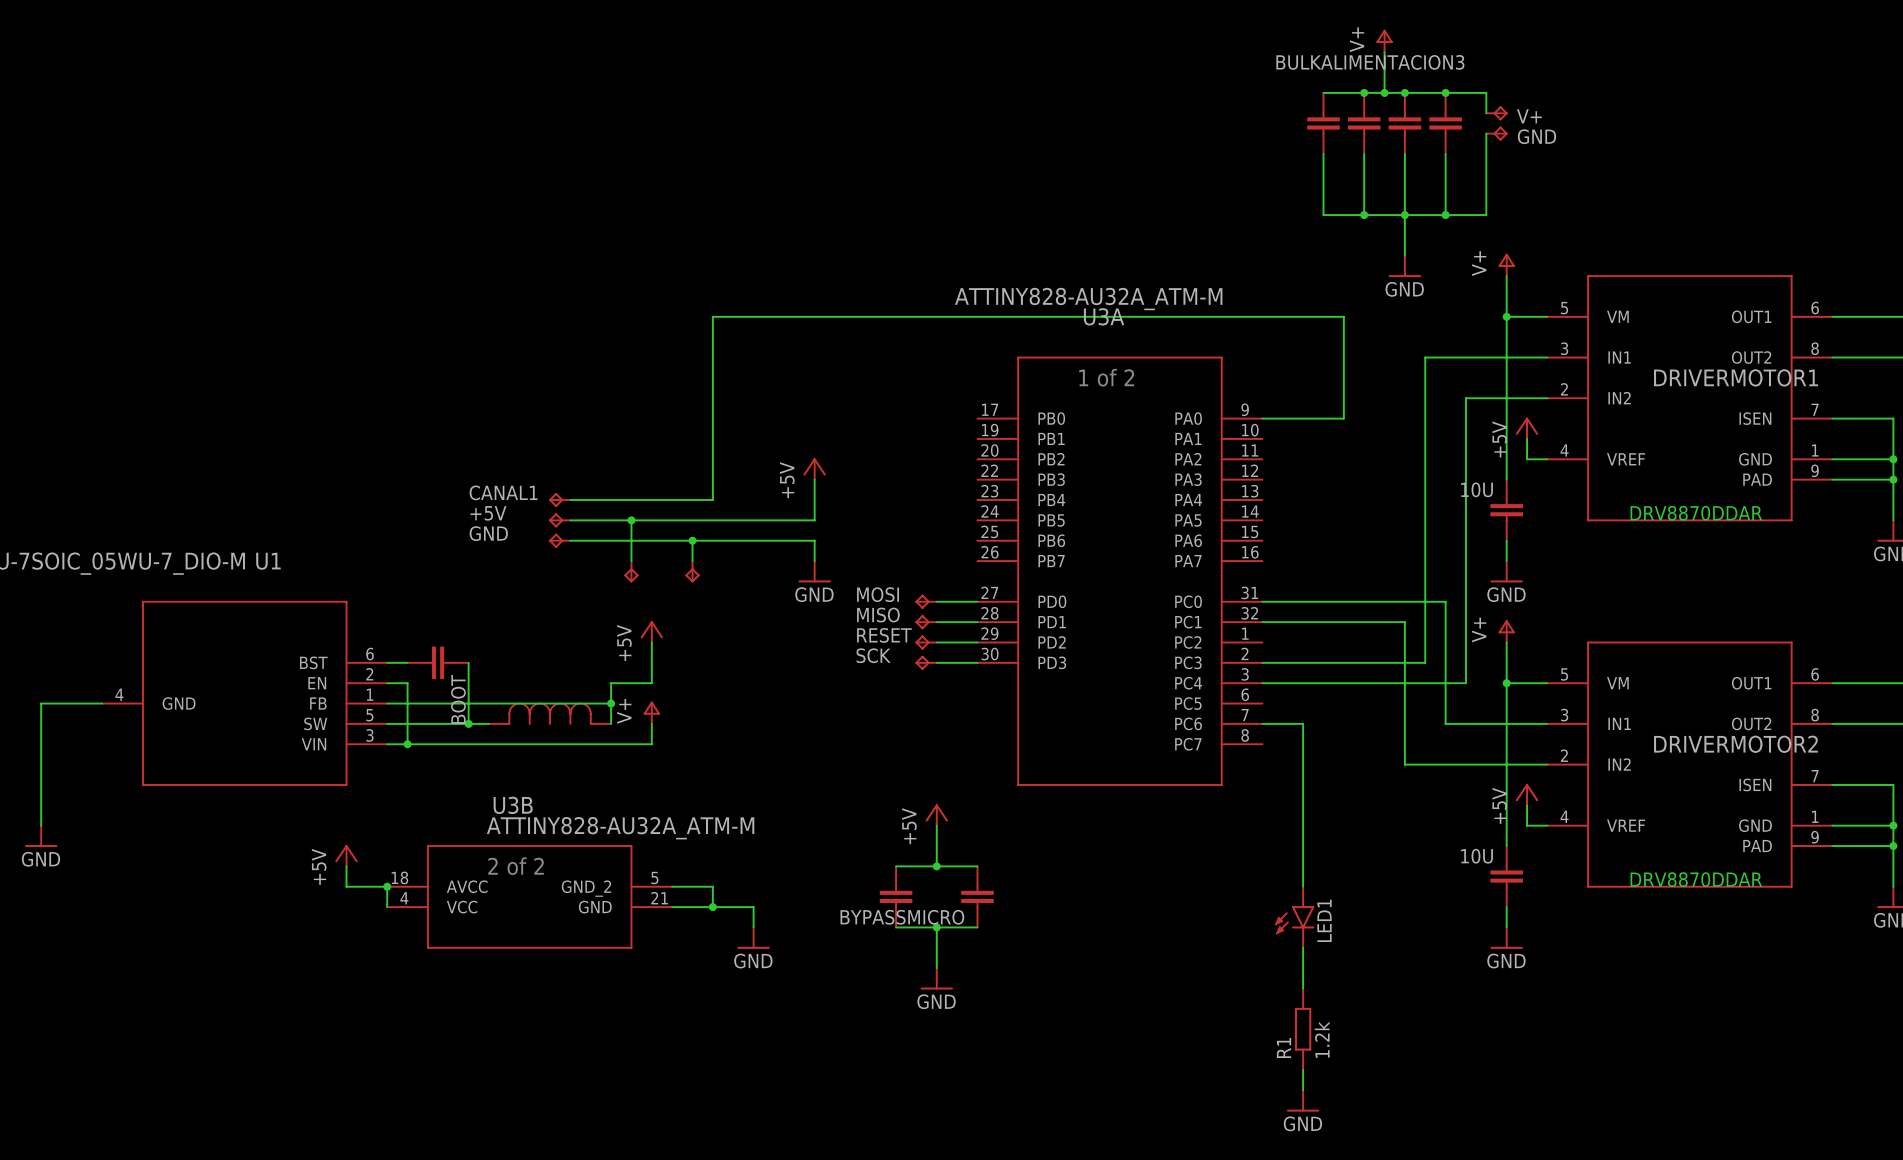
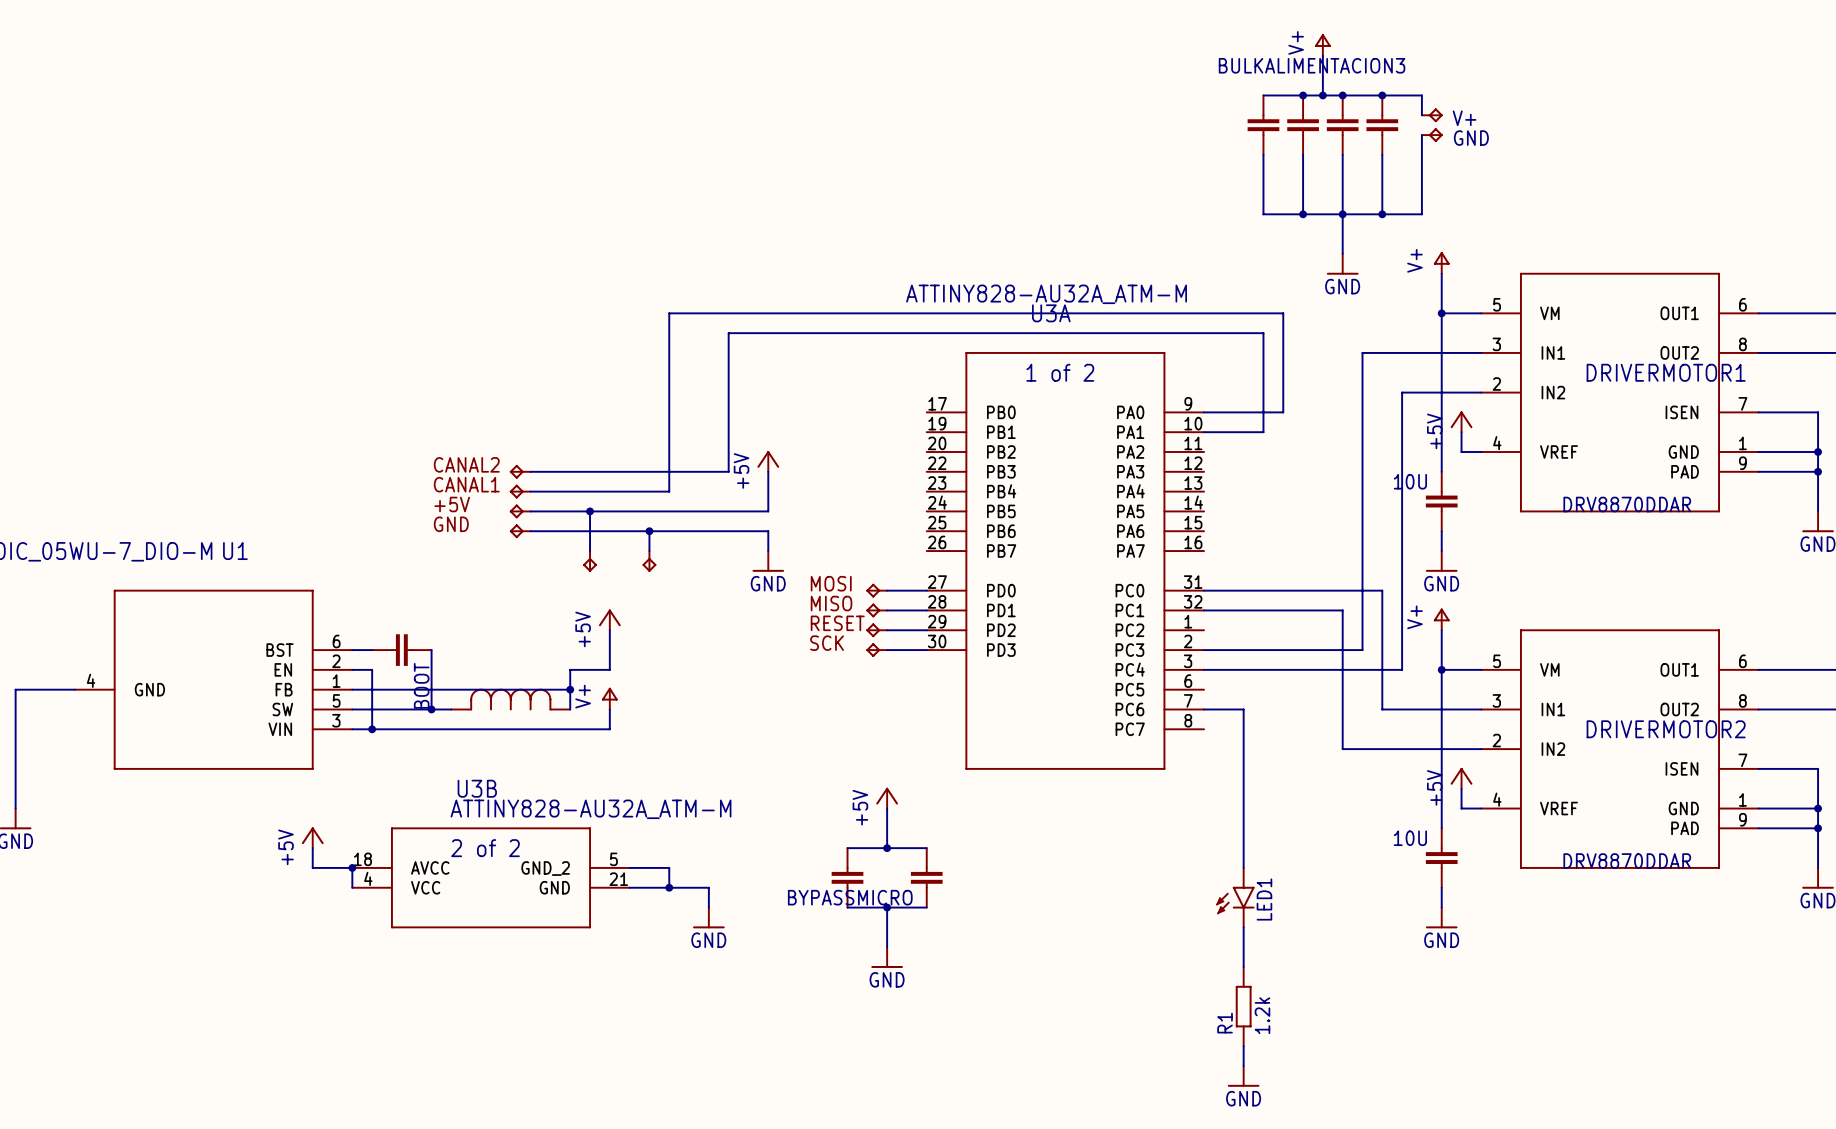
wire: none -> (1204, 432) (1263, 432) (1263, 333) (728, 333) (728, 471) (530, 471)
label: none -> CANAL2 (466, 464)
part: none -> (520, 471)

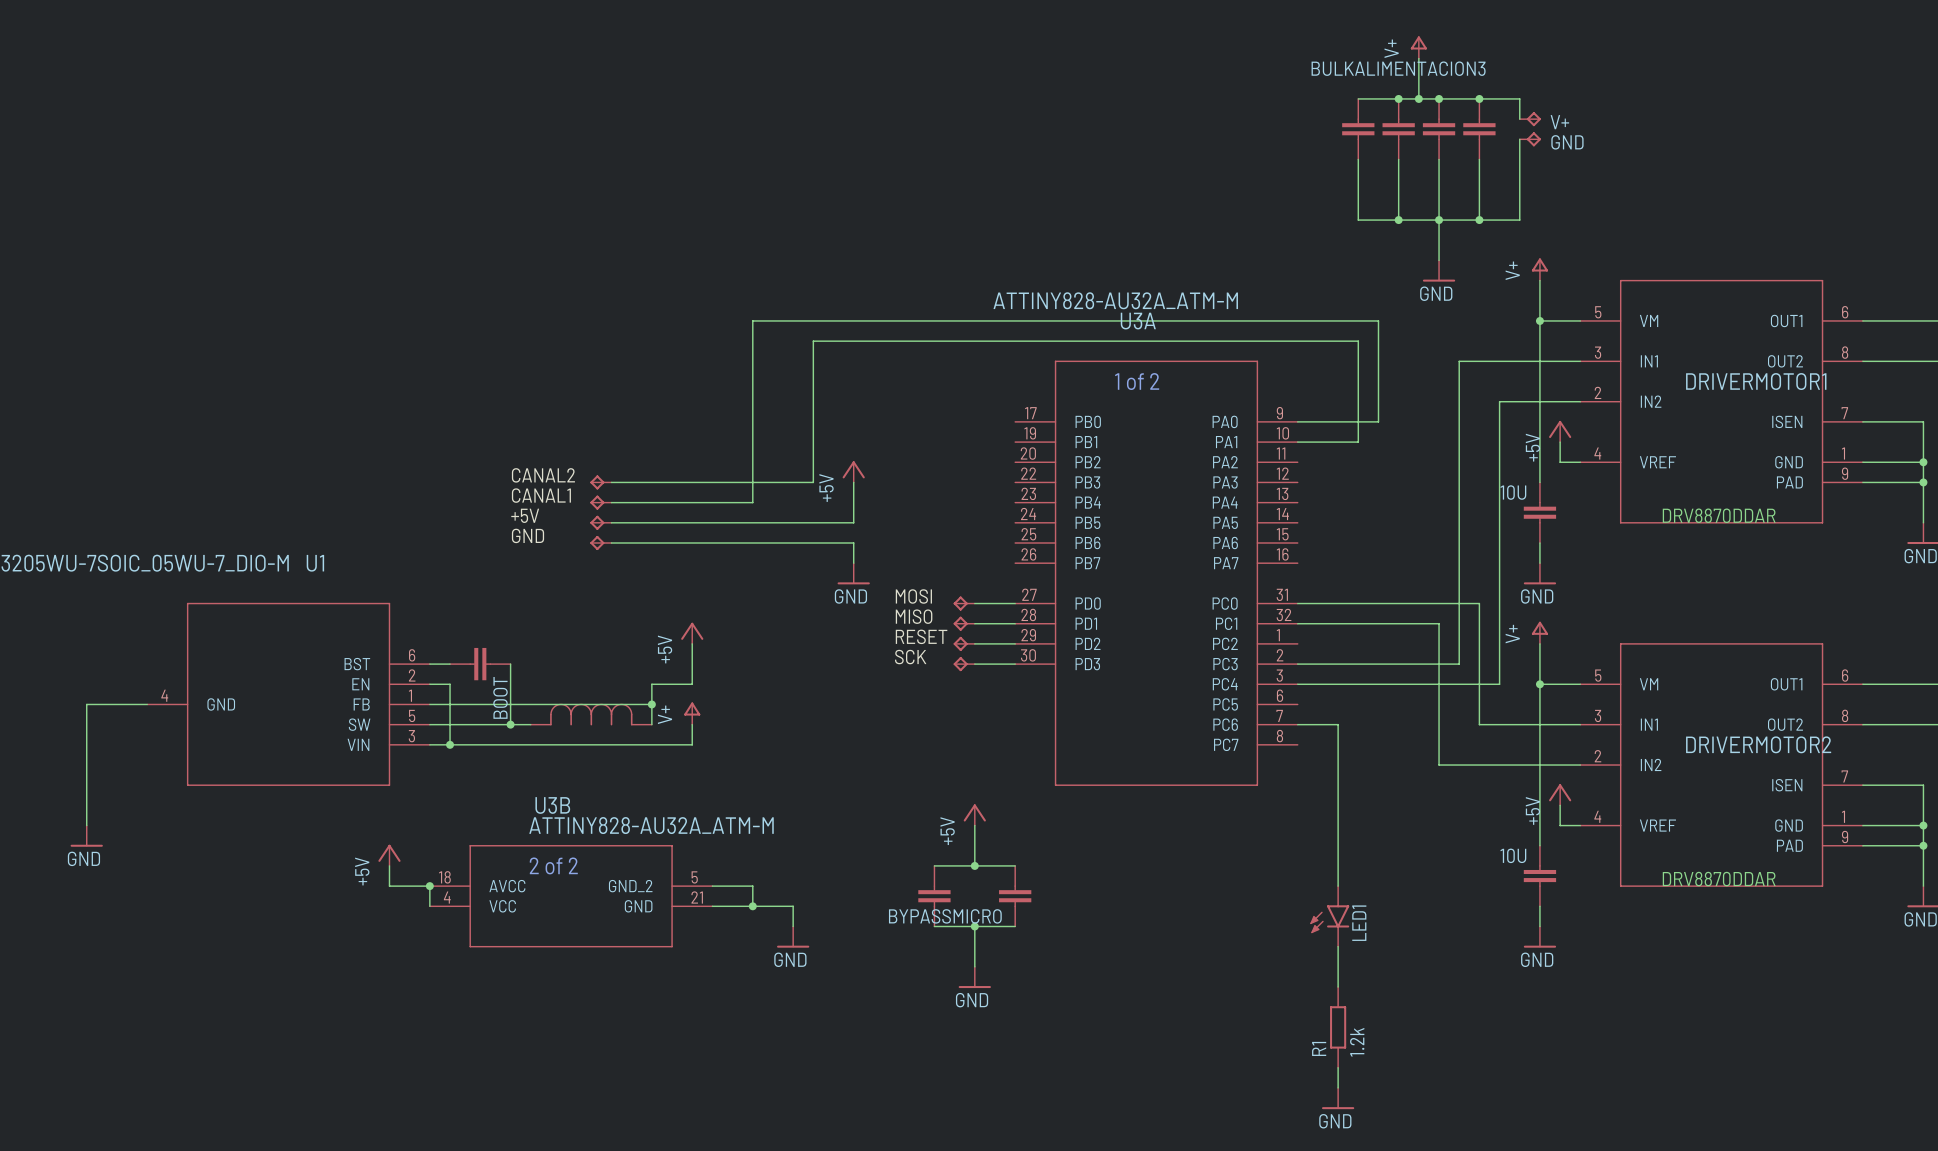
wire: (590, 511) (590, 551) -> none
junction: (590, 511) -> none
wire: (649, 531) (649, 551) -> none
junction: (649, 531) -> none
part: (590, 561) -> none
part: (649, 561) -> none

